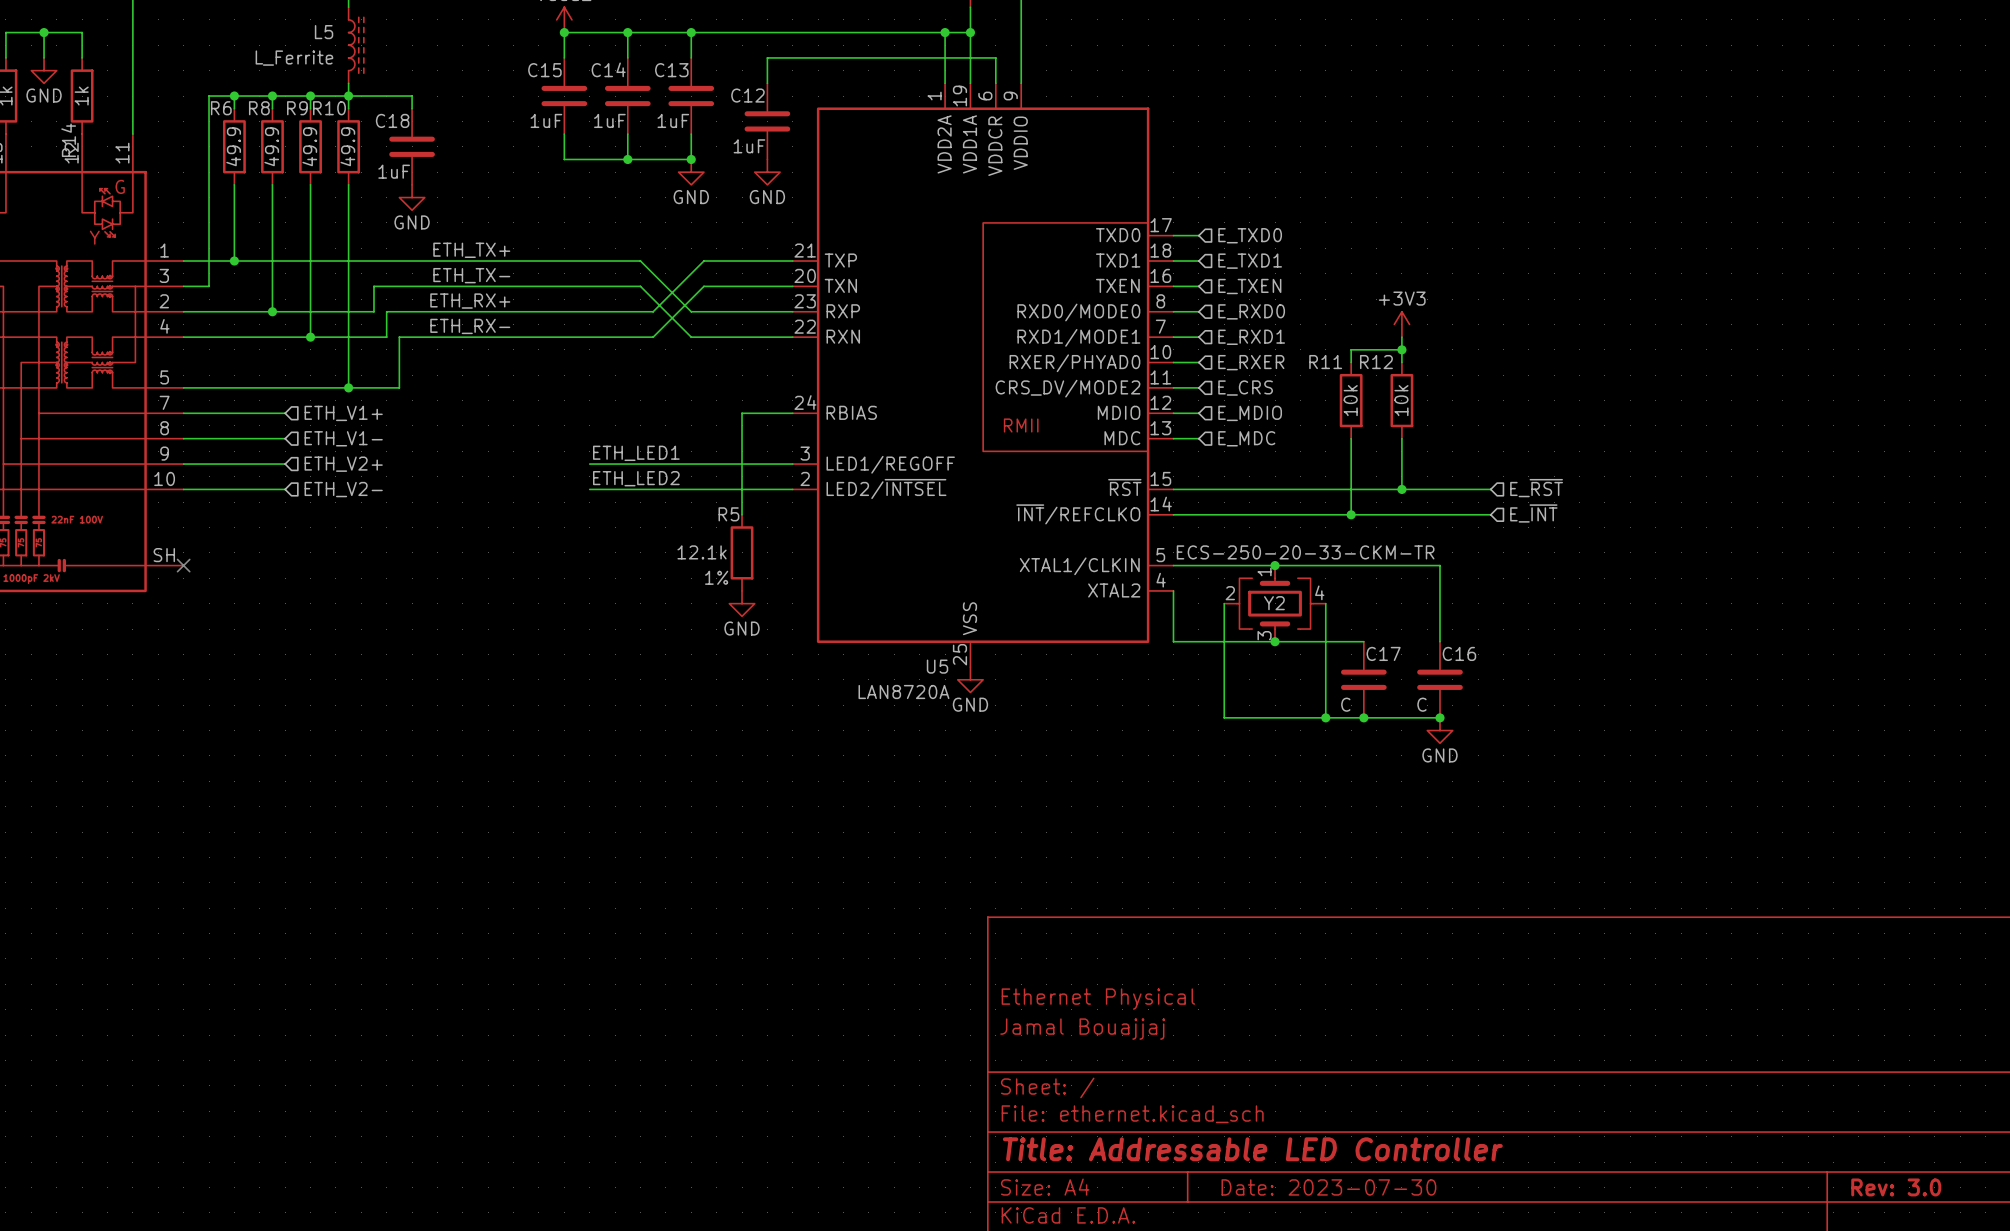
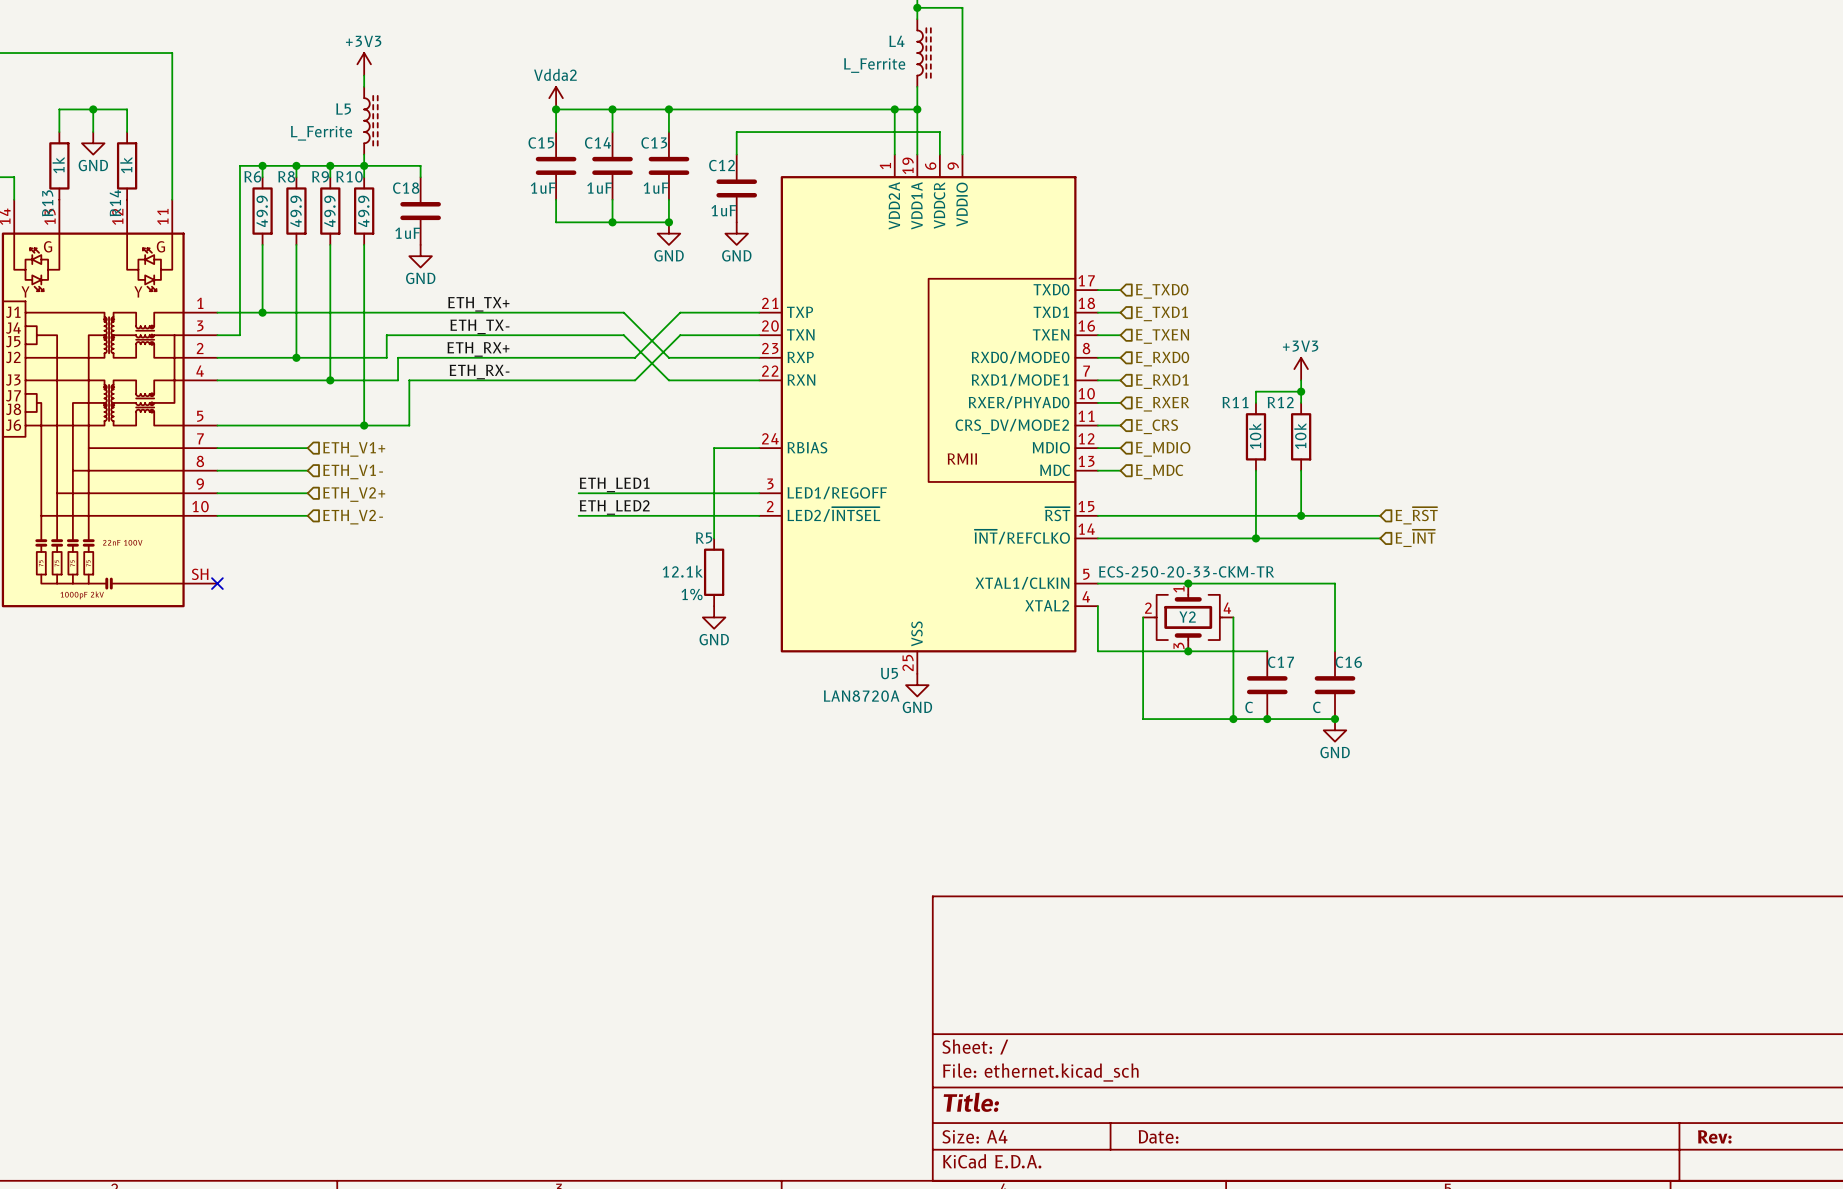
title block: Ethernet Physical (1098, 999) -> none
title block: Jamal Bouajjaj (1082, 1029) -> none
title block: Title: Addressable LED Controller (1252, 1149) -> Title: (971, 1102)
title block: Date: 2023-07-30 (1328, 1187) -> Date: (1158, 1136)
title block: Rev: 3.0 (1896, 1187) -> Rev: (1714, 1136)

